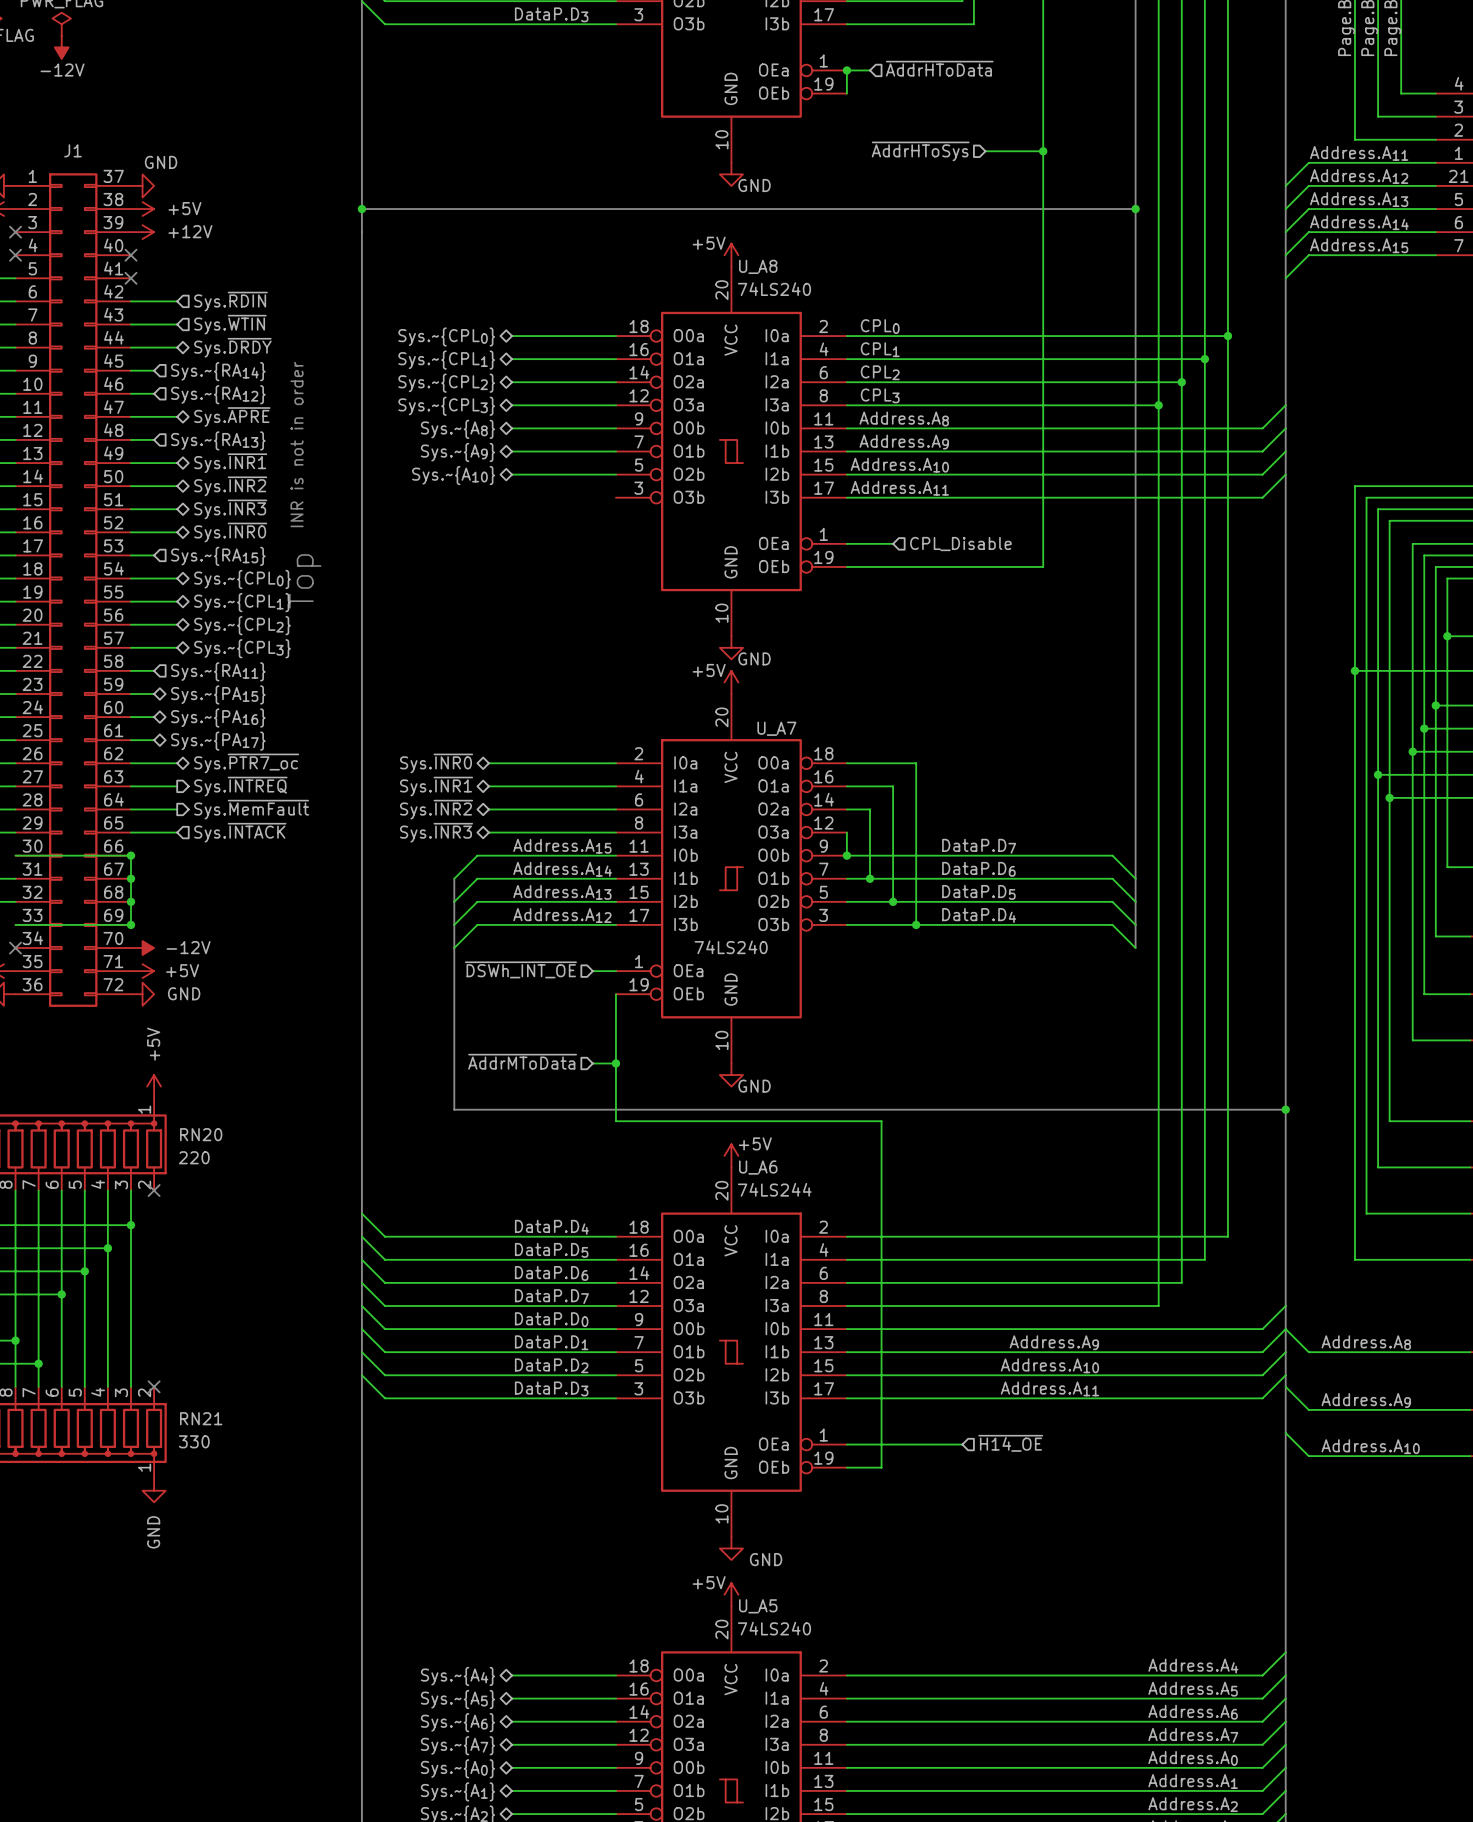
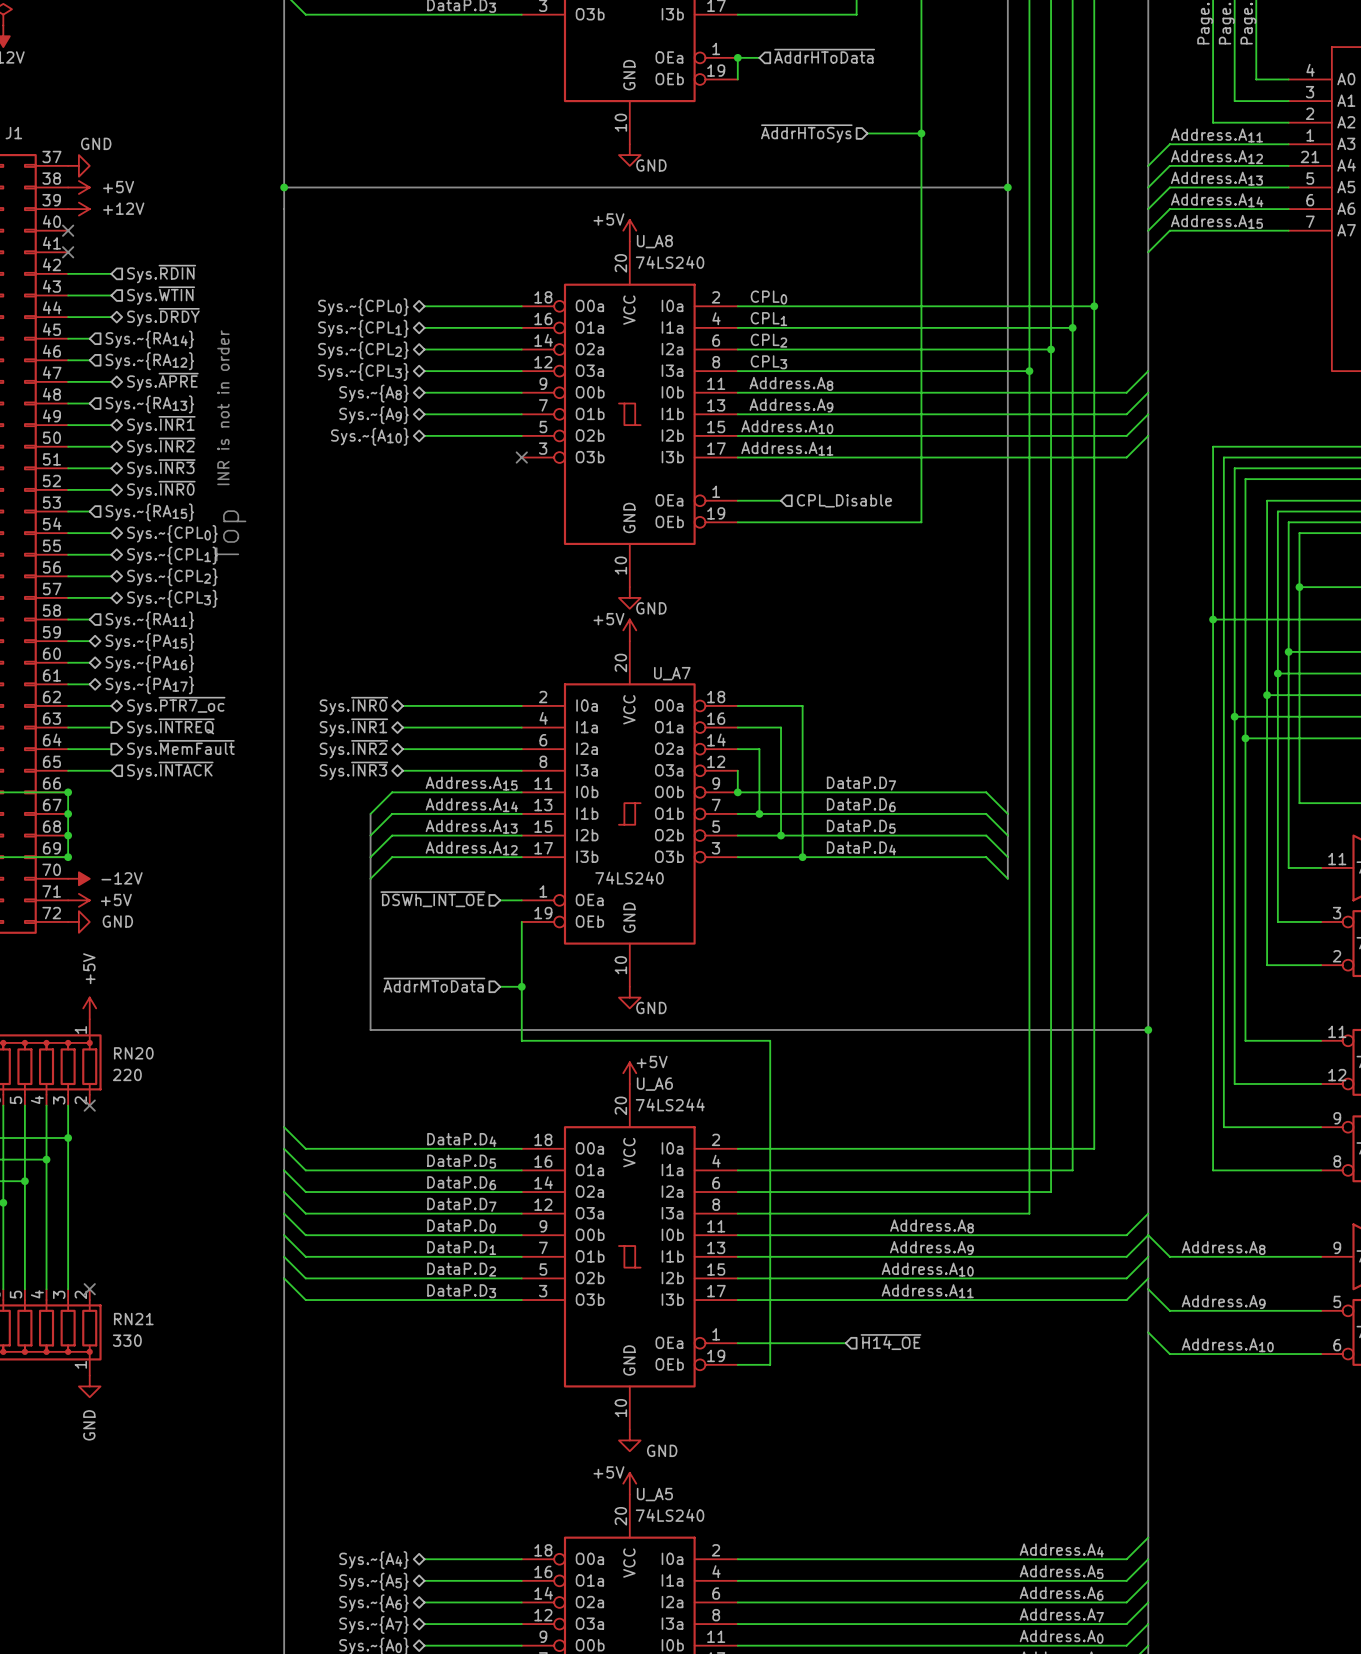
no-connect mark: none -> (521, 457)
label: none -> Address.A8 (932, 1226)

